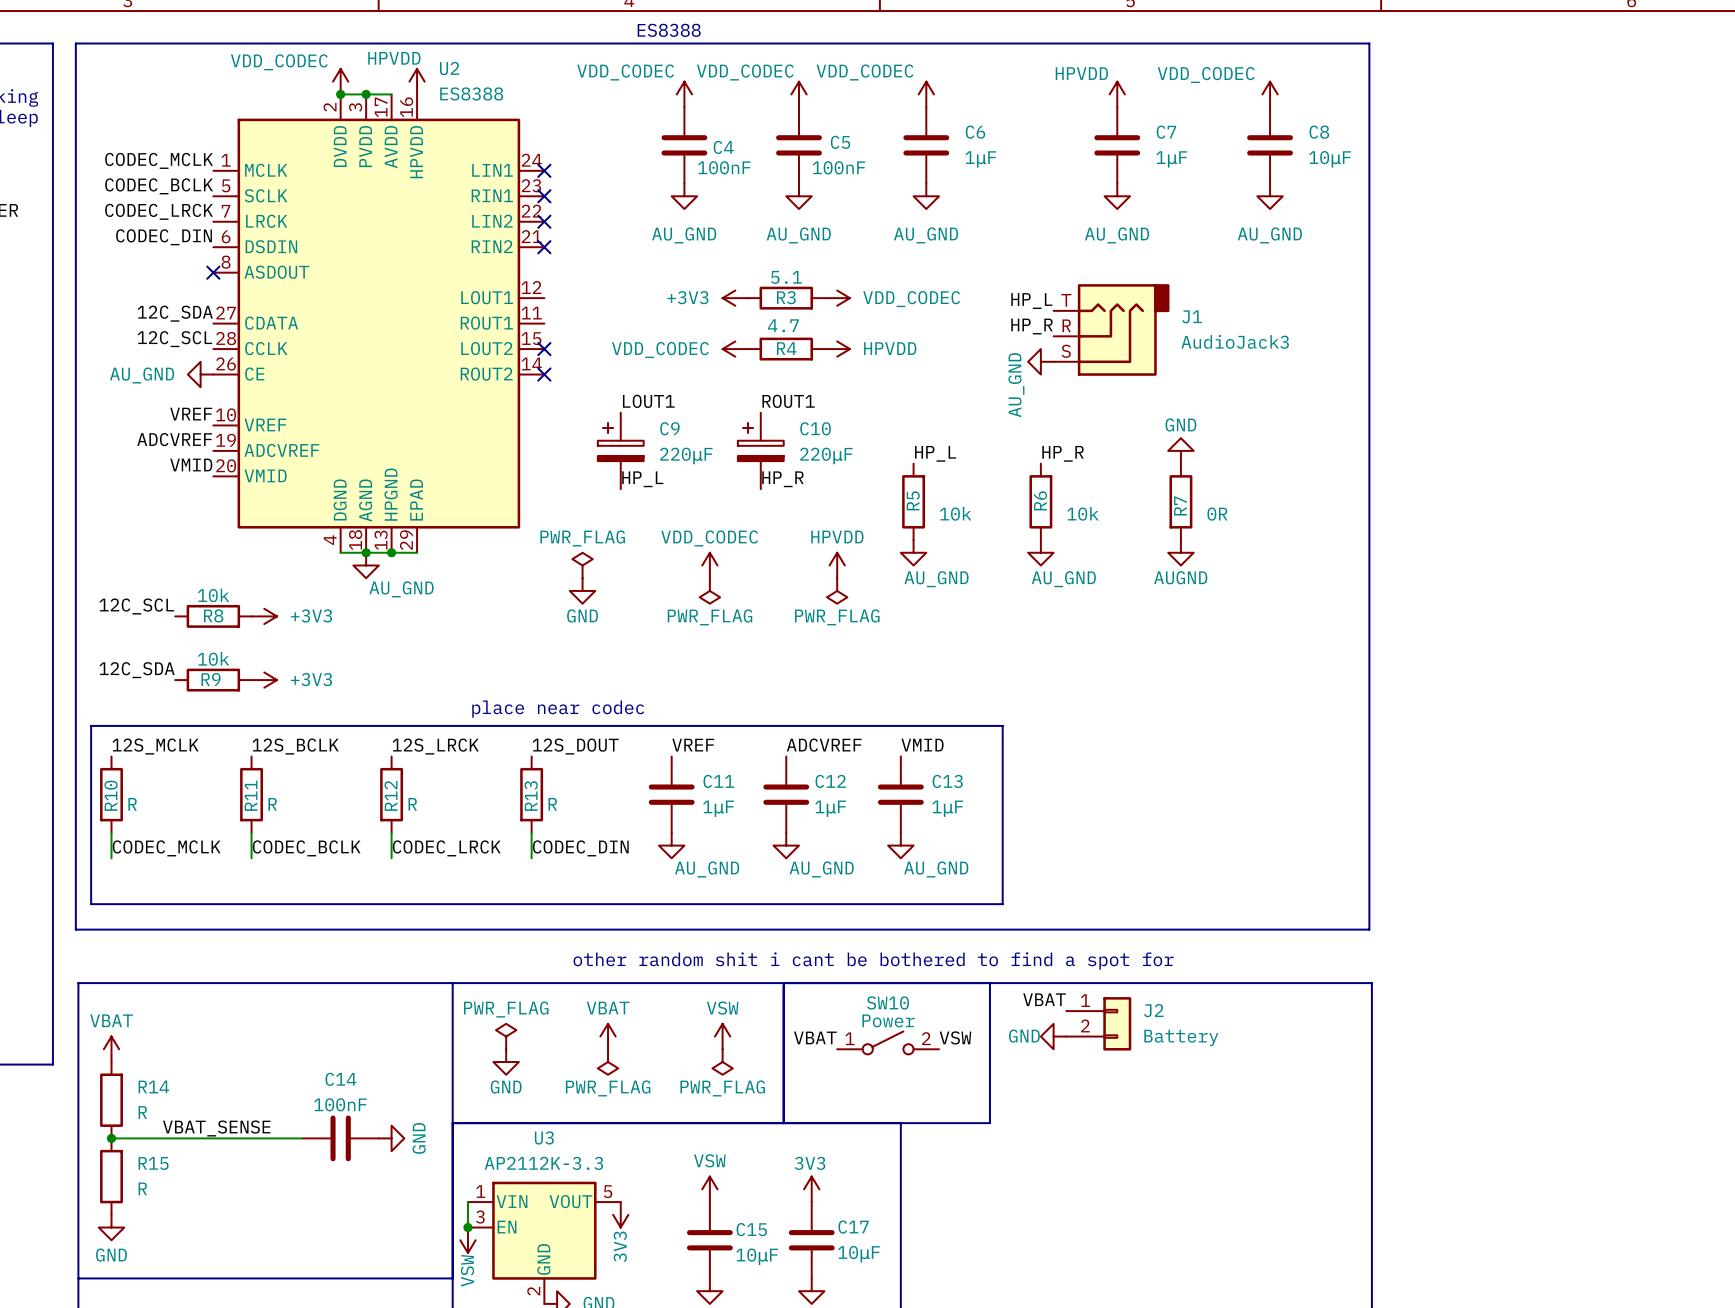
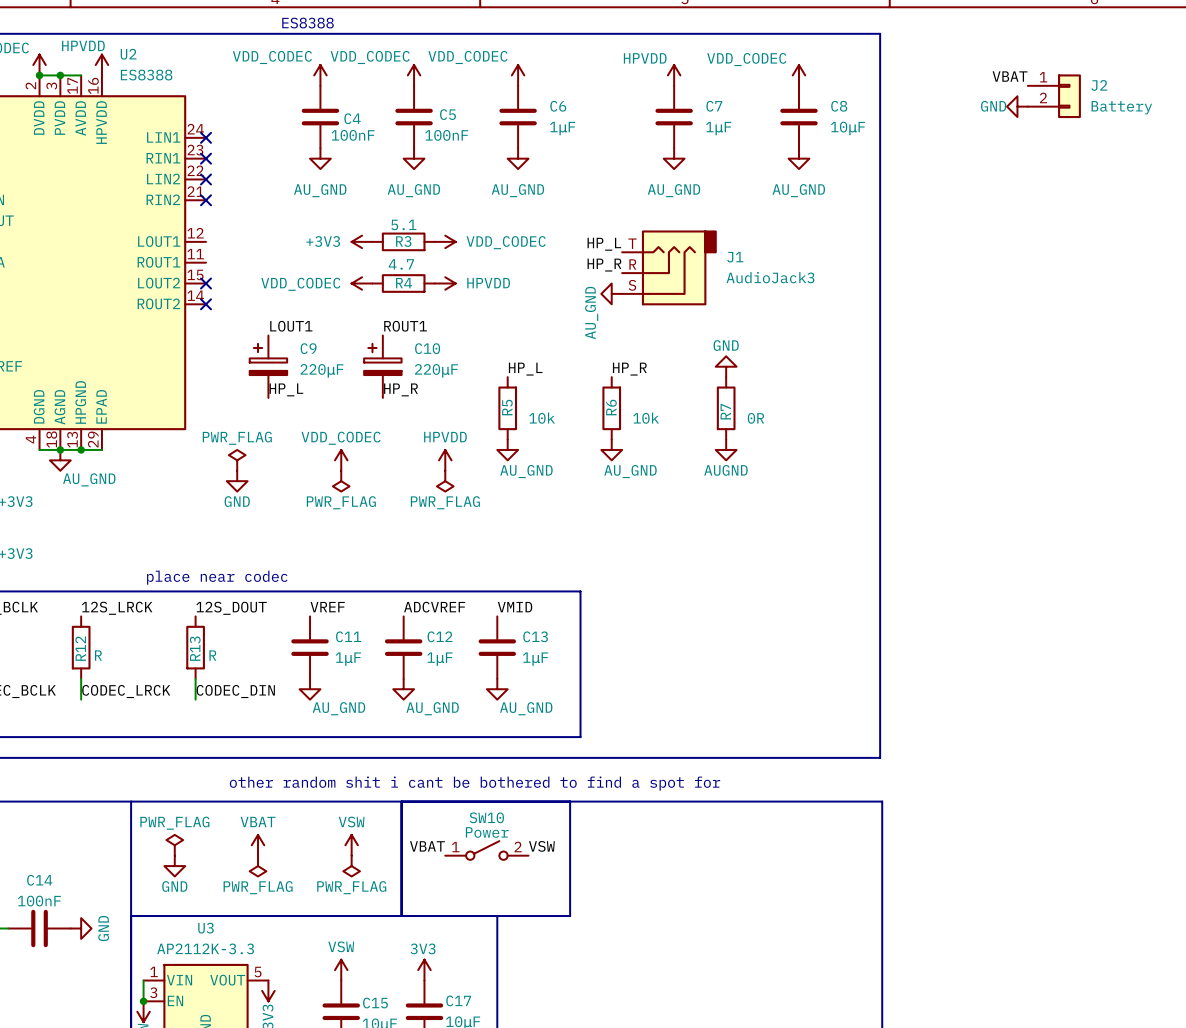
label: none -> VBAT (1010, 76)
power symbol: none -> GND (1017, 106)
label: VBAT (1044, 999) -> none
J2 position: (1098, 1023) -> (1054, 96)
power symbol: GND (1053, 1036) -> none

